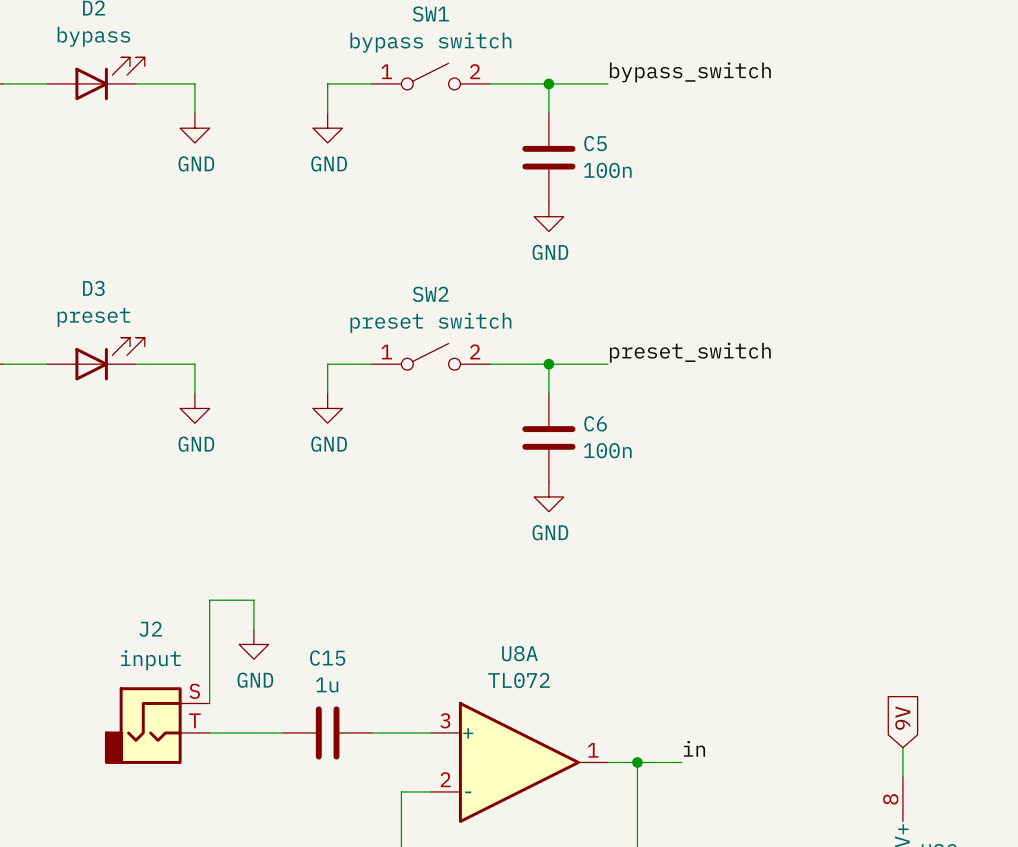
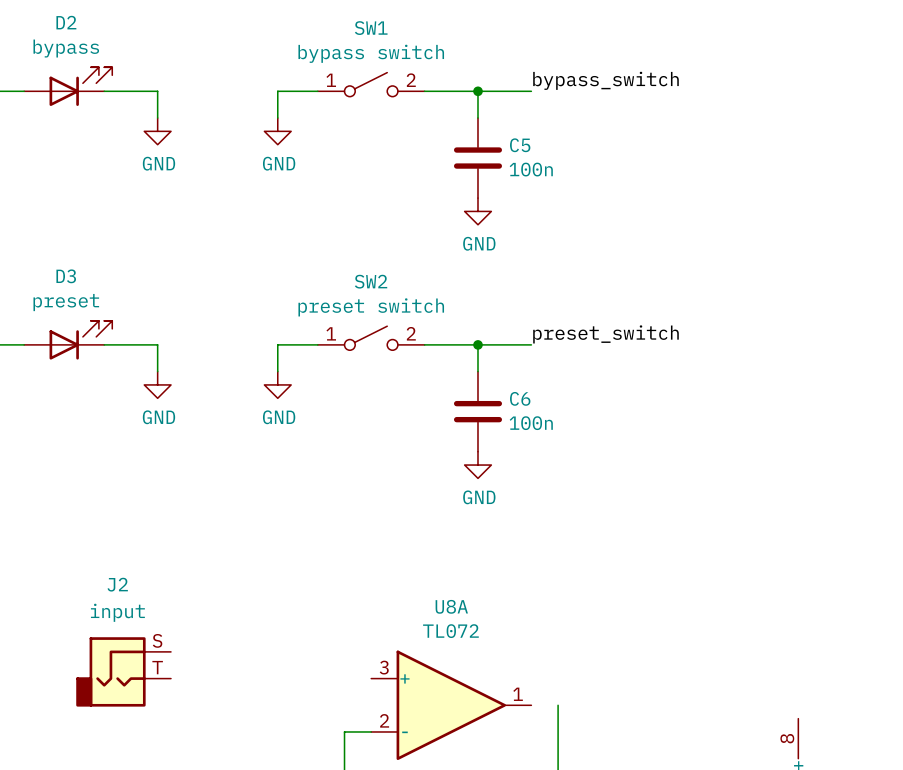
wire: (253, 629) (253, 600) (209, 600) (209, 703) -> none
power symbol: GND (253, 644) -> none
global label: 9V (902, 718) -> none
wire: (209, 732) (283, 732) -> none
C15: 1u (327, 732) -> none
wire: (371, 732) (430, 732) -> none
wire: (902, 747) (902, 777) -> none
label: in (694, 748) -> none
wire: (607, 762) (681, 762) -> none
junction: (637, 762) -> none

